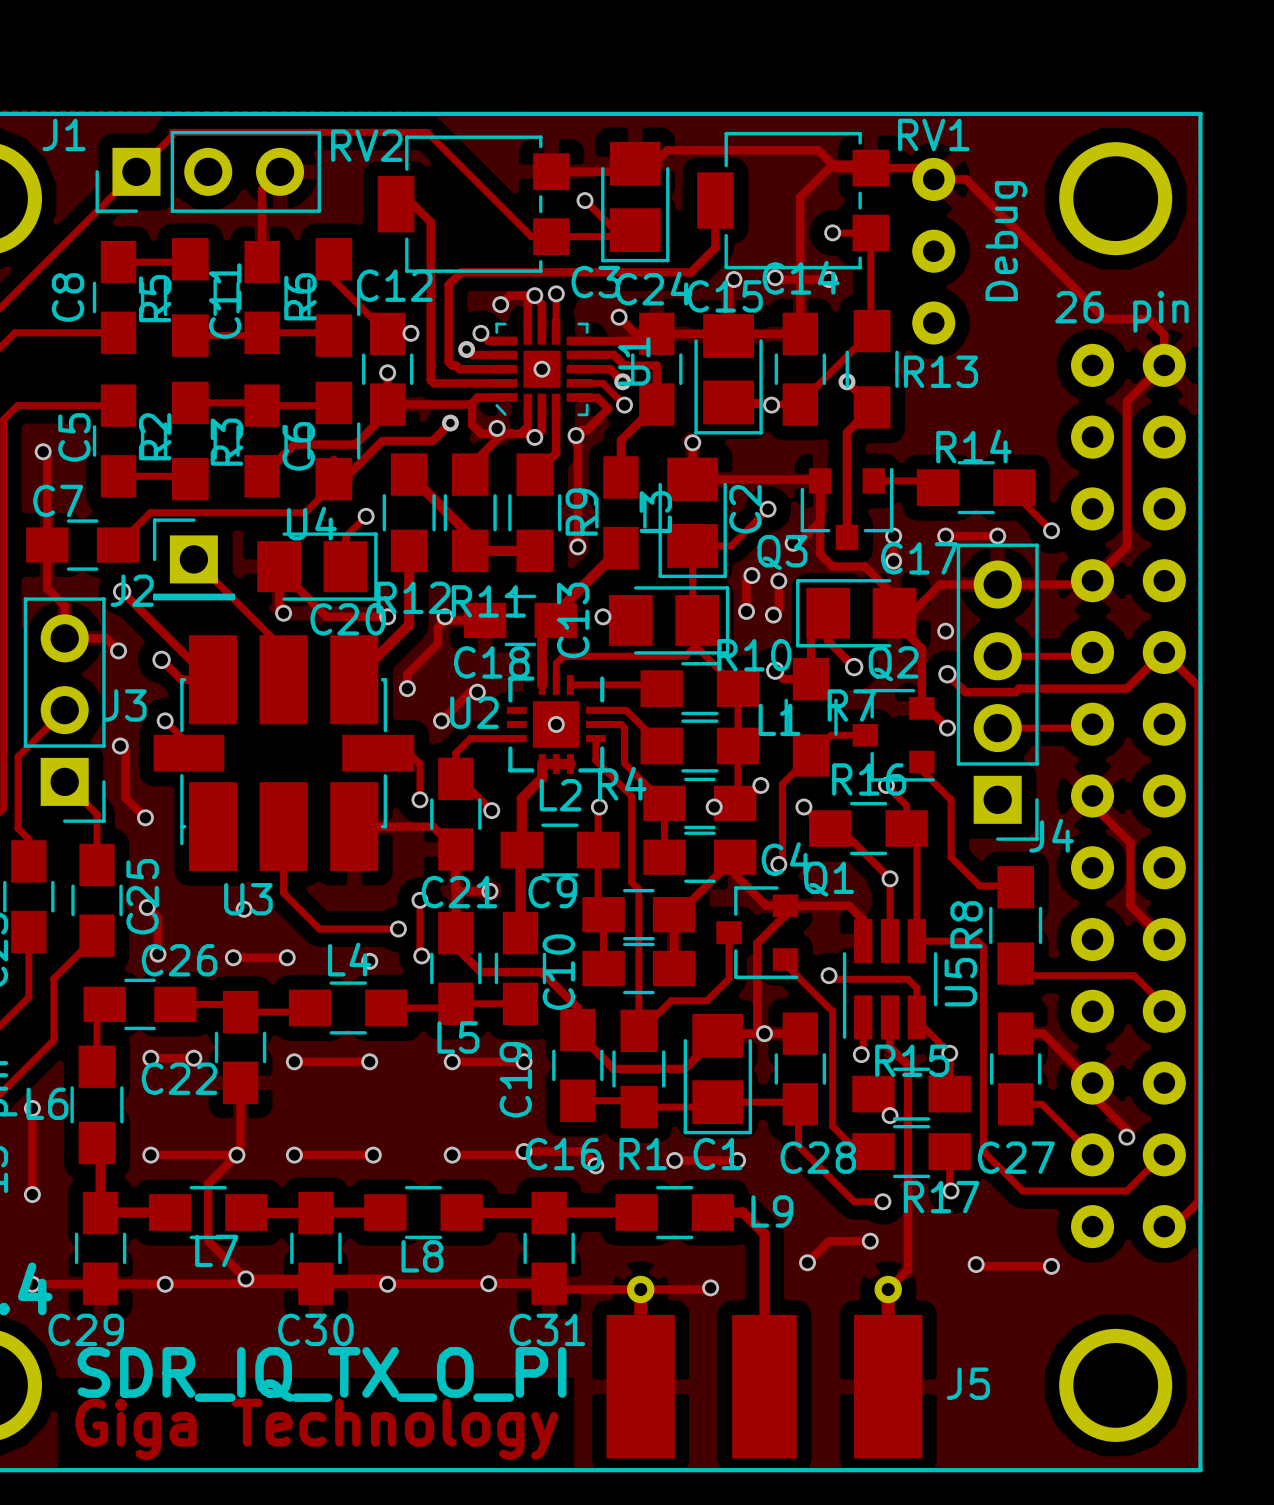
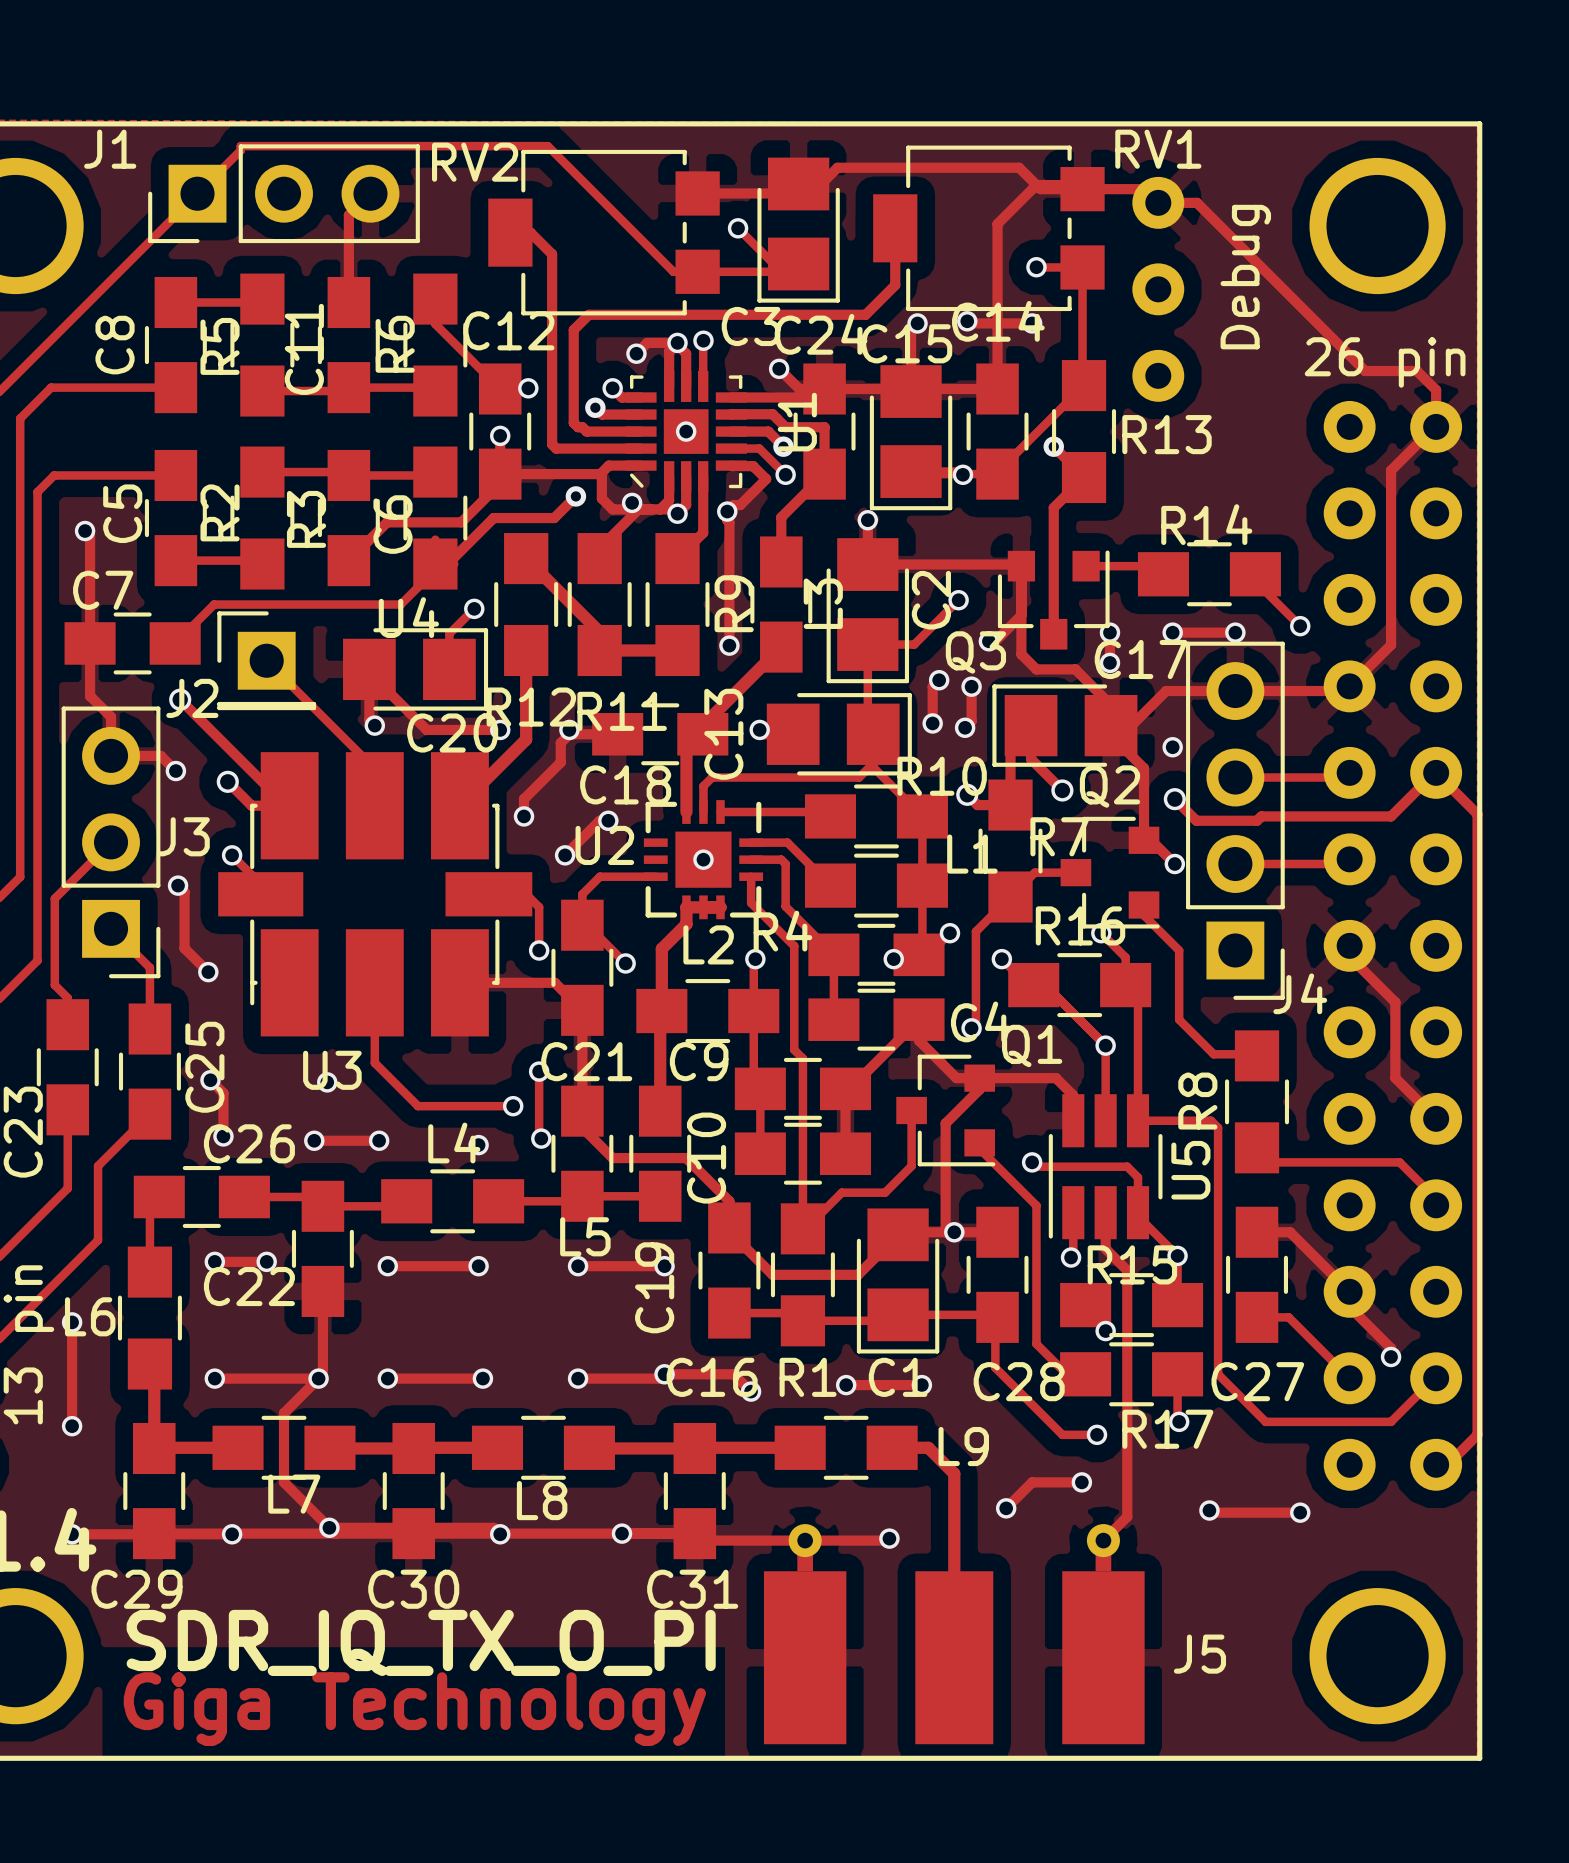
track: (455, 891) (489, 891) -> none
via: (489, 891) -> none

